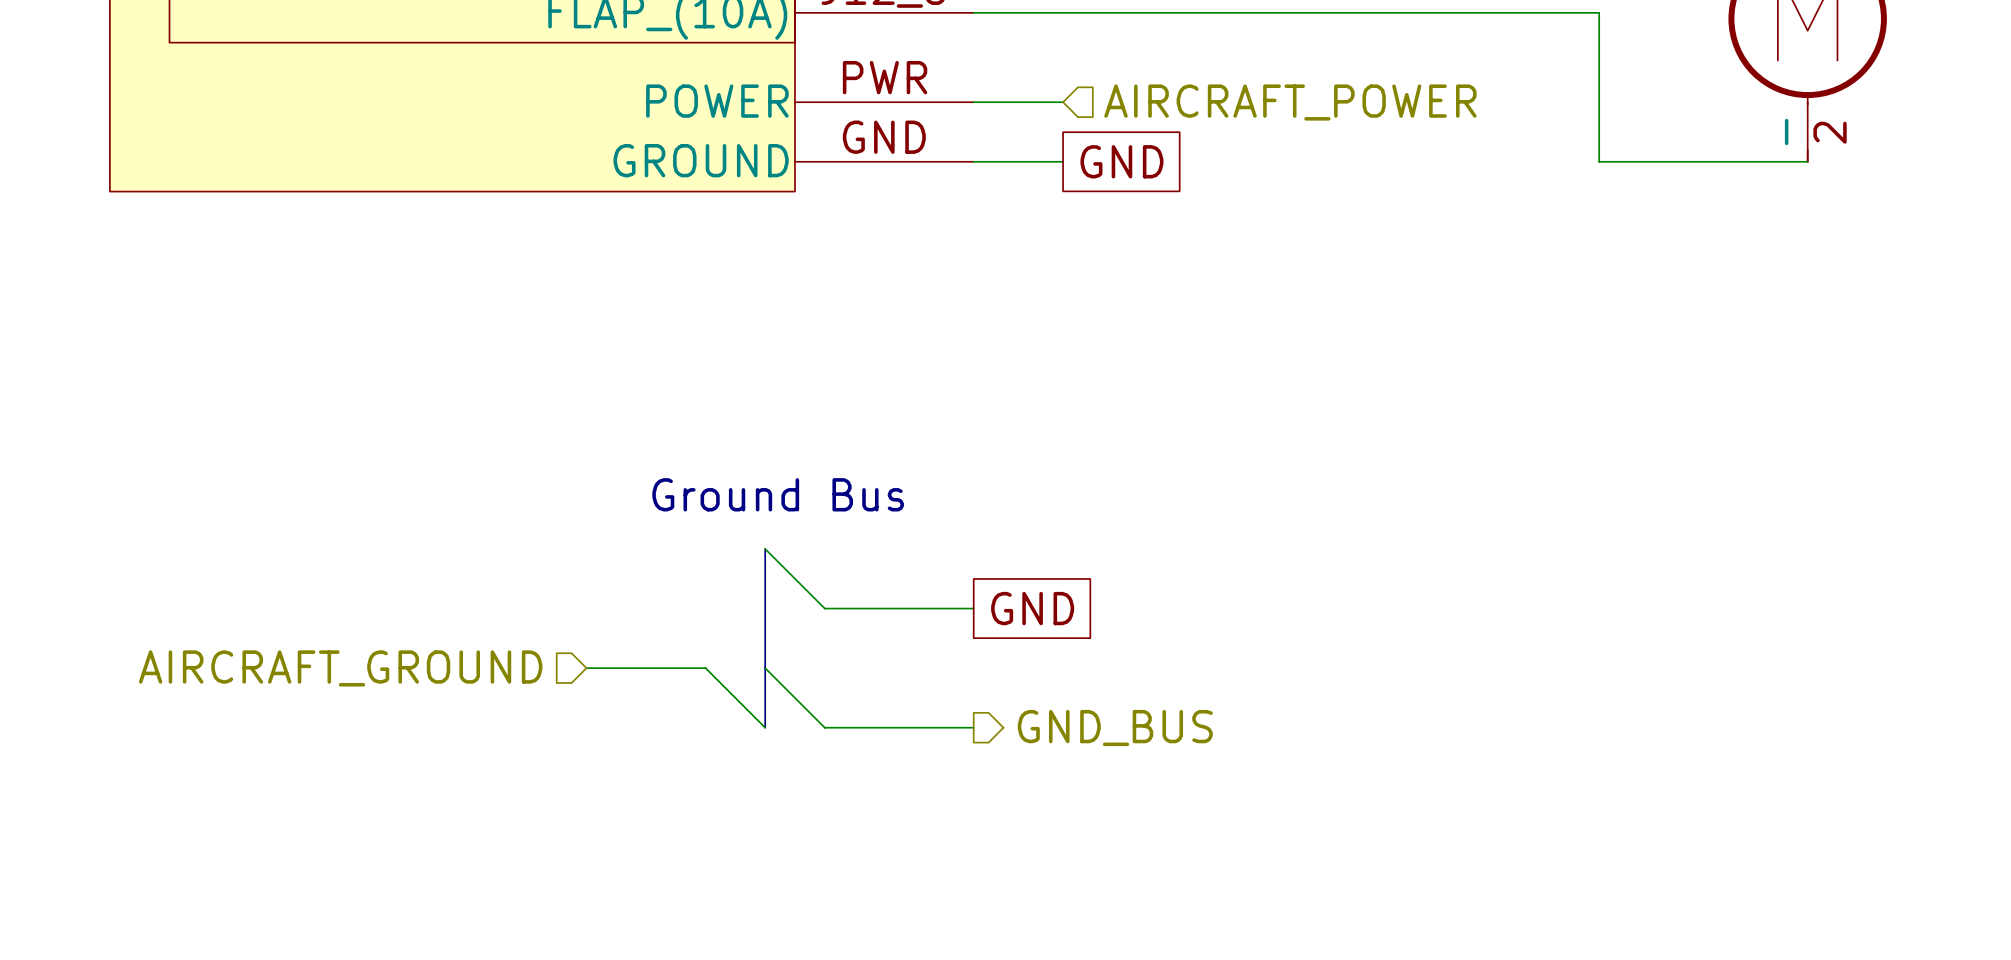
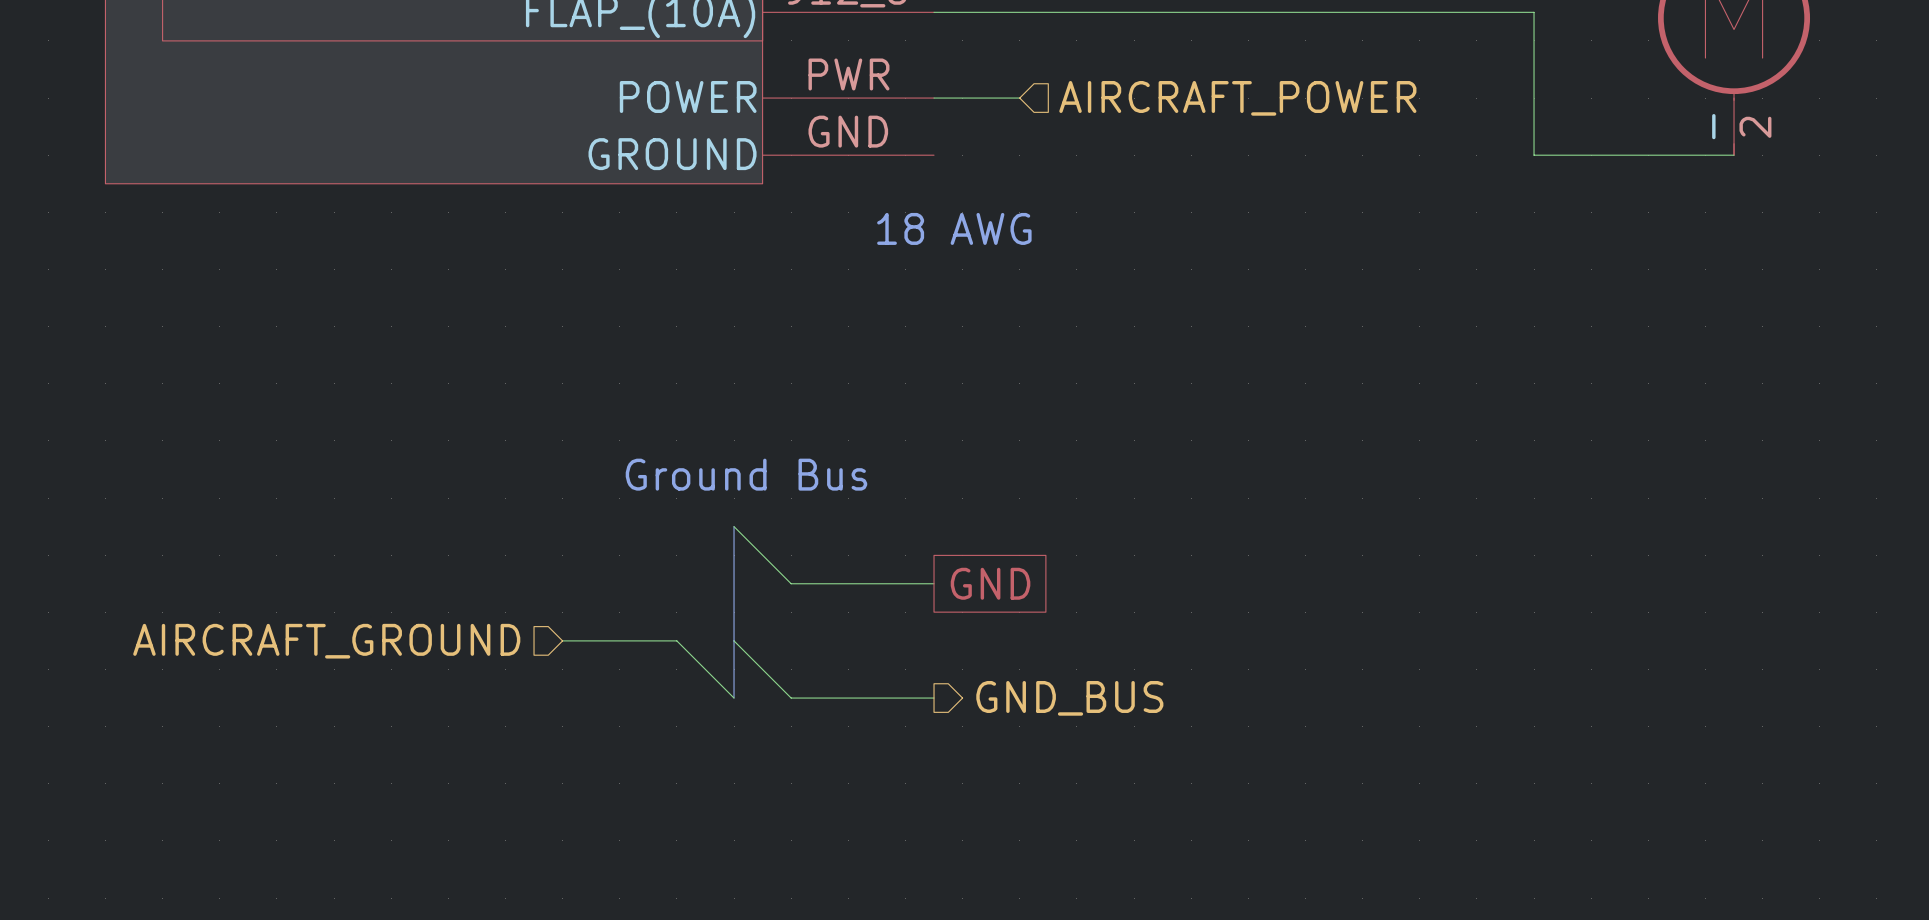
wire: (973, 161) (1063, 161) -> none
global label: GND (1121, 161) -> none
text: none -> 18 AWG (954, 228)

